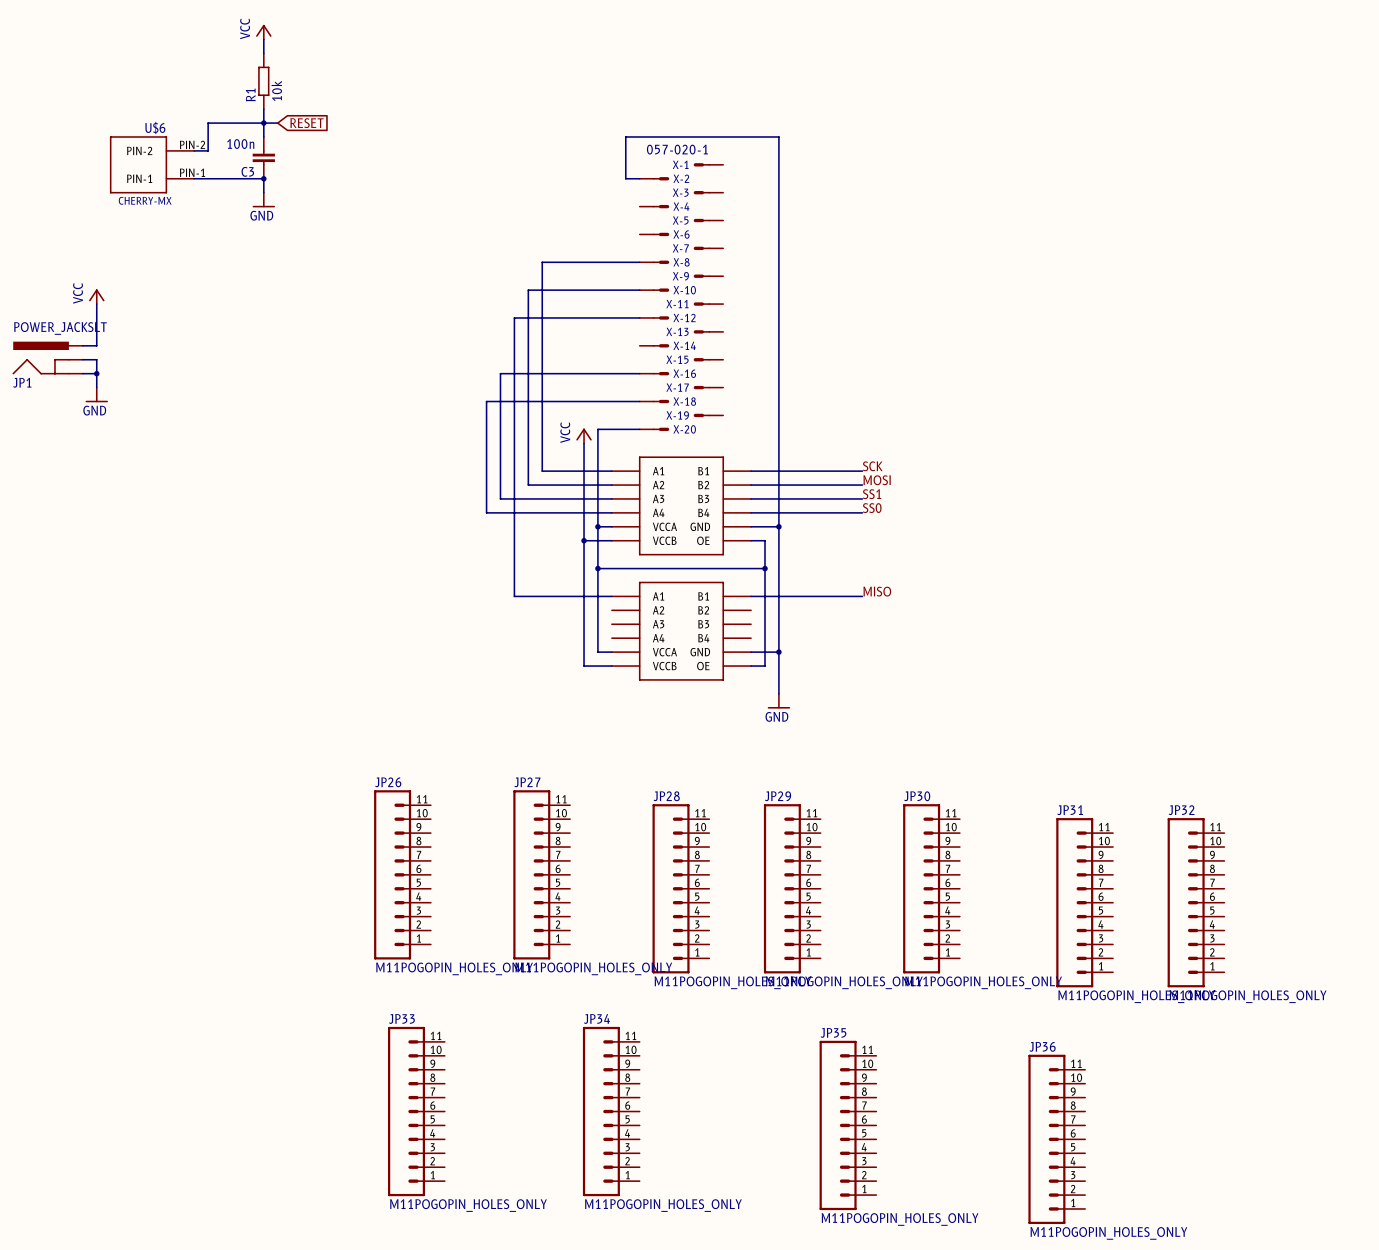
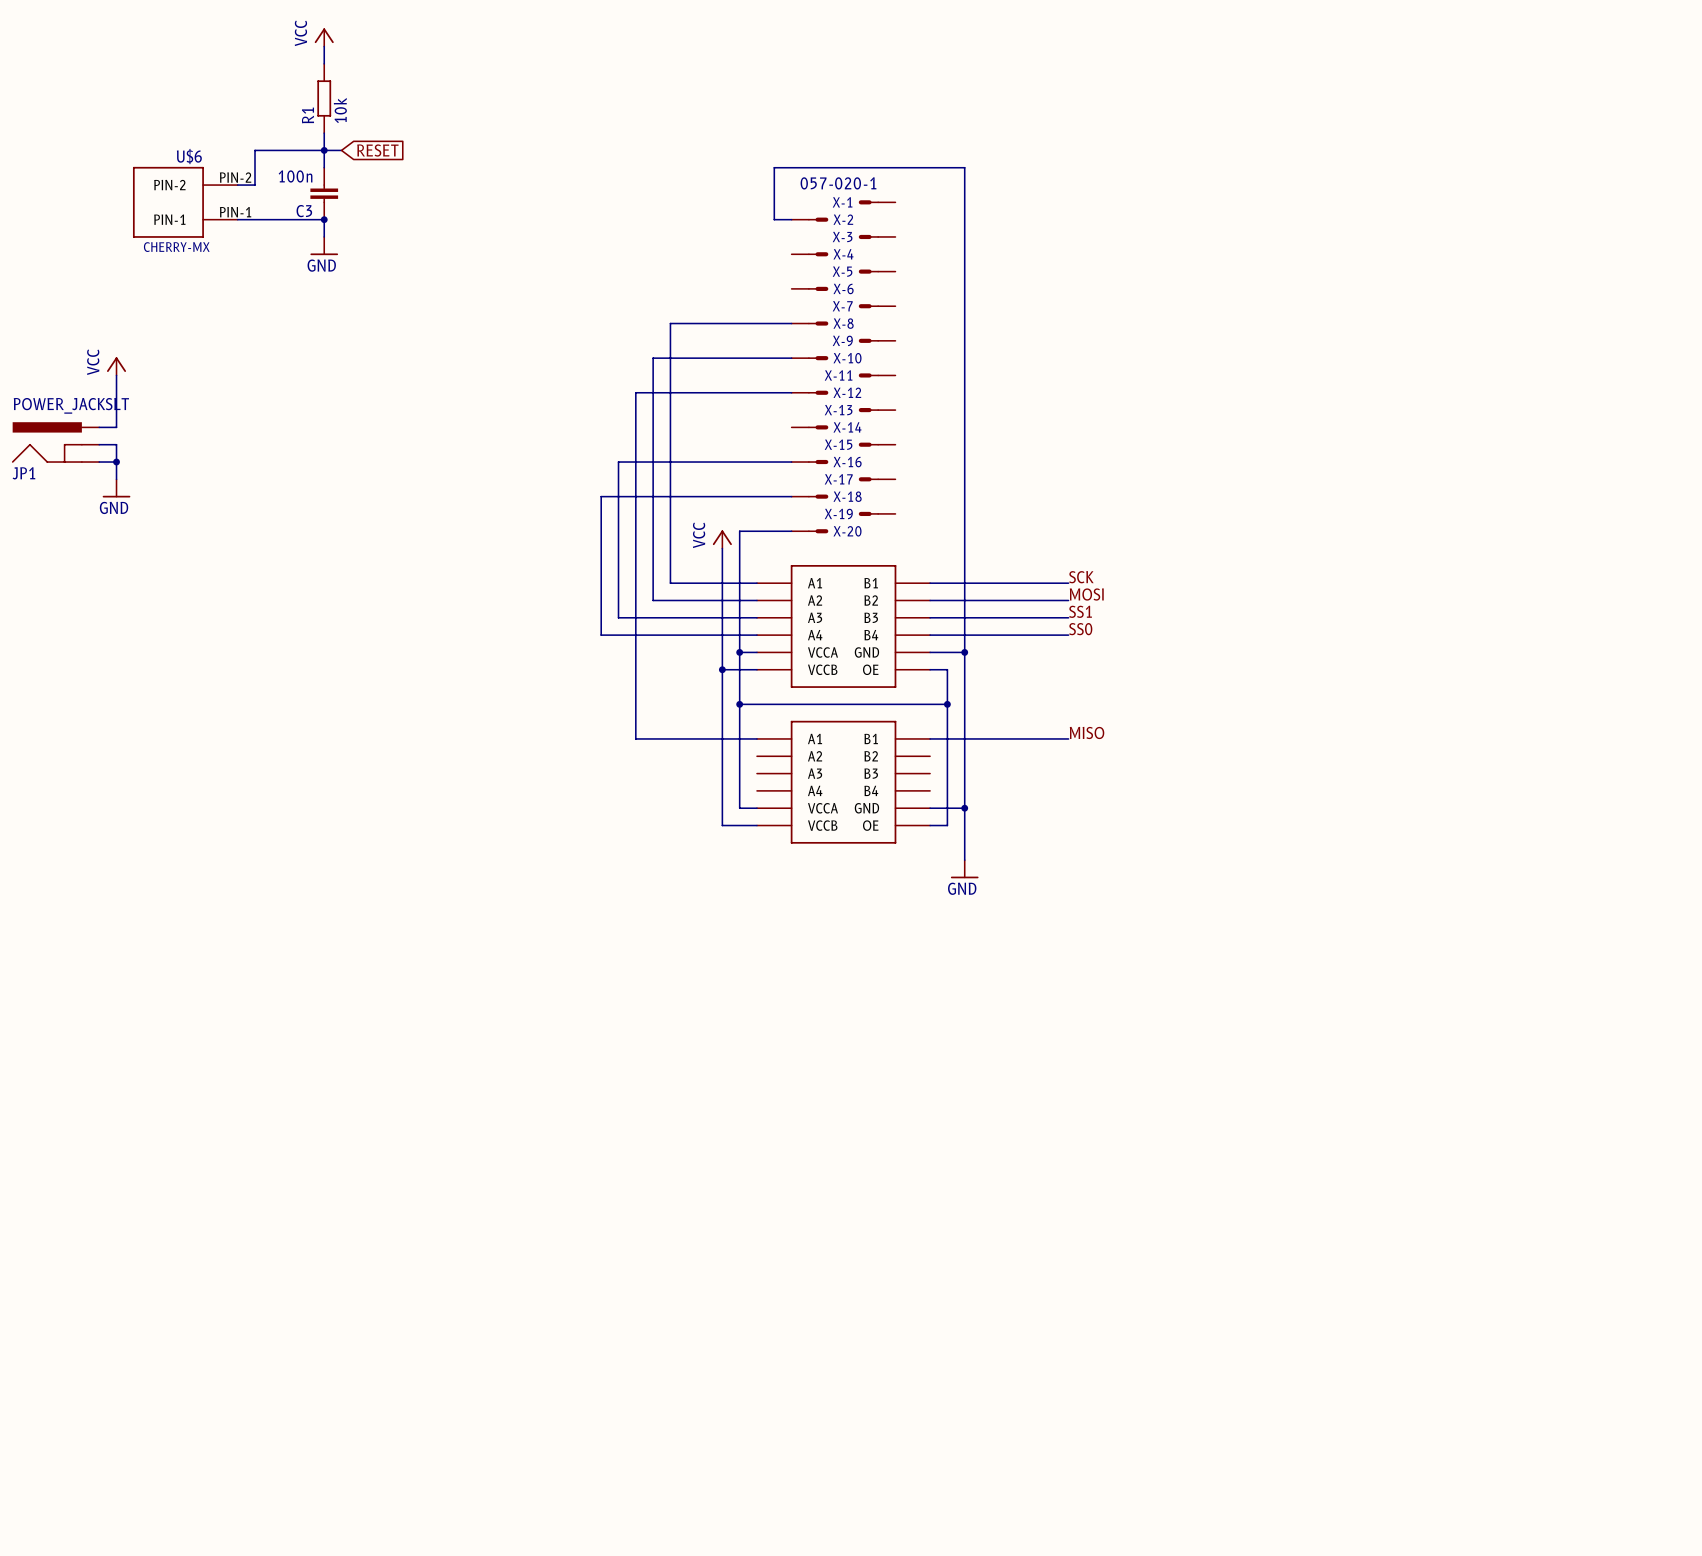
JP26: M11POGOPIN_HOLES_ONLY (402, 874) -> none
JP27: M11POGOPIN_HOLES_ONLY (541, 874) -> none
JP28: M11POGOPIN_HOLES_ONLY (680, 888) -> none
JP29: M11POGOPIN_HOLES_ONLY (792, 888) -> none
JP30: M11POGOPIN_HOLES_ONLY (931, 888) -> none
JP31: M11POGOPIN_HOLES_ONLY (1084, 902) -> none
JP32: M11POGOPIN_HOLES_ONLY (1196, 902) -> none
JP33: M11POGOPIN_HOLES_ONLY (416, 1111) -> none
JP34: M11POGOPIN_HOLES_ONLY (611, 1111) -> none
JP35: M11POGOPIN_HOLES_ONLY (847, 1125) -> none
JP36: M11POGOPIN_HOLES_ONLY (1056, 1139) -> none

